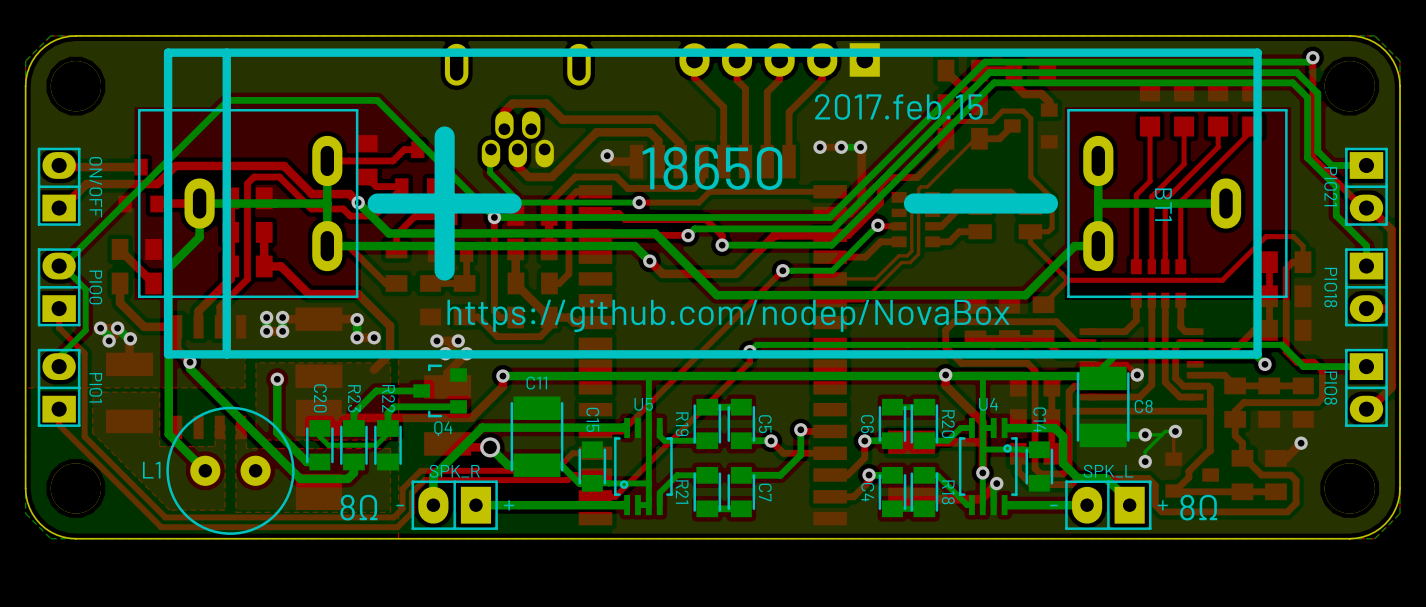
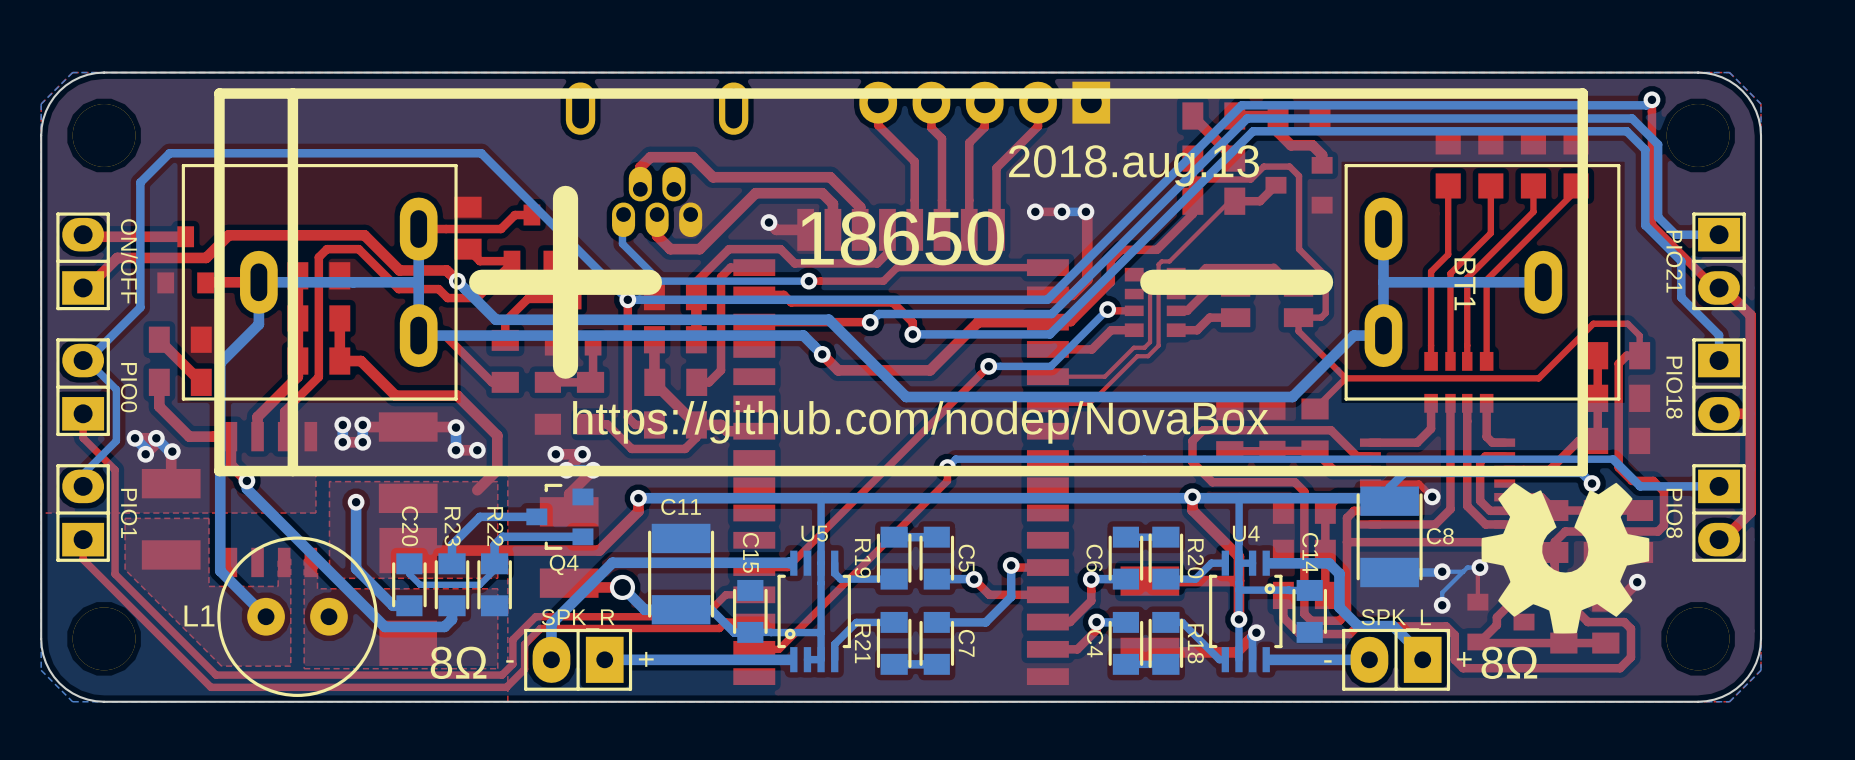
bottom track: (228, 100) (104, 223) -> (294, 153) (169, 153) (140, 182) (140, 307)
text: 2017.feb.15 (898, 106) -> 2018.aug.13 (1134, 165)
drawing: none -> [1481, 482, 1650, 634]

